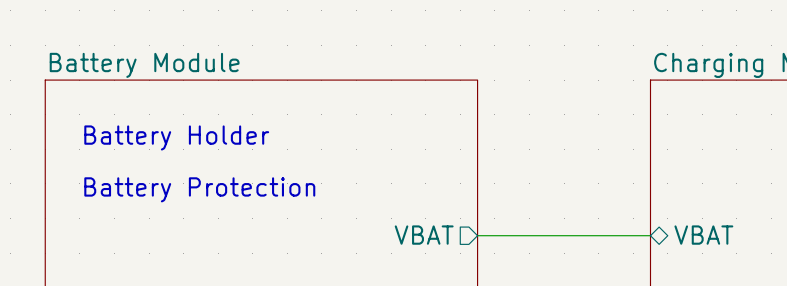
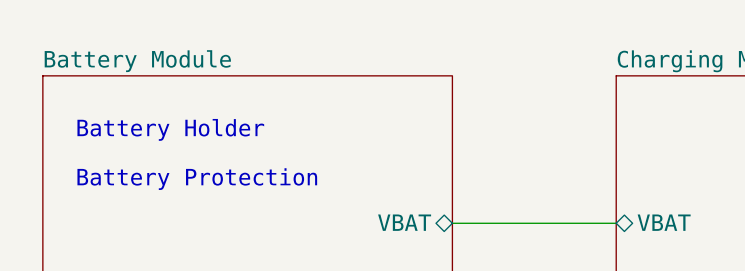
sheet pin shape: output (424, 235) -> bidirectional (404, 222)

